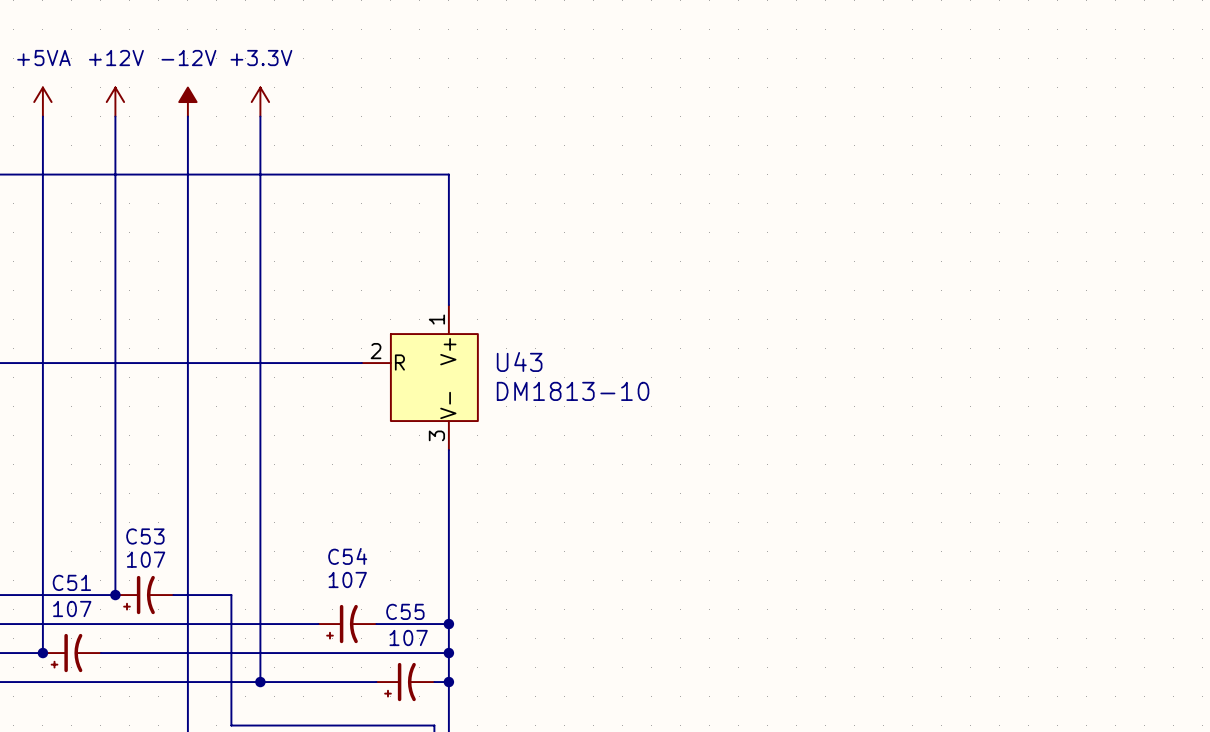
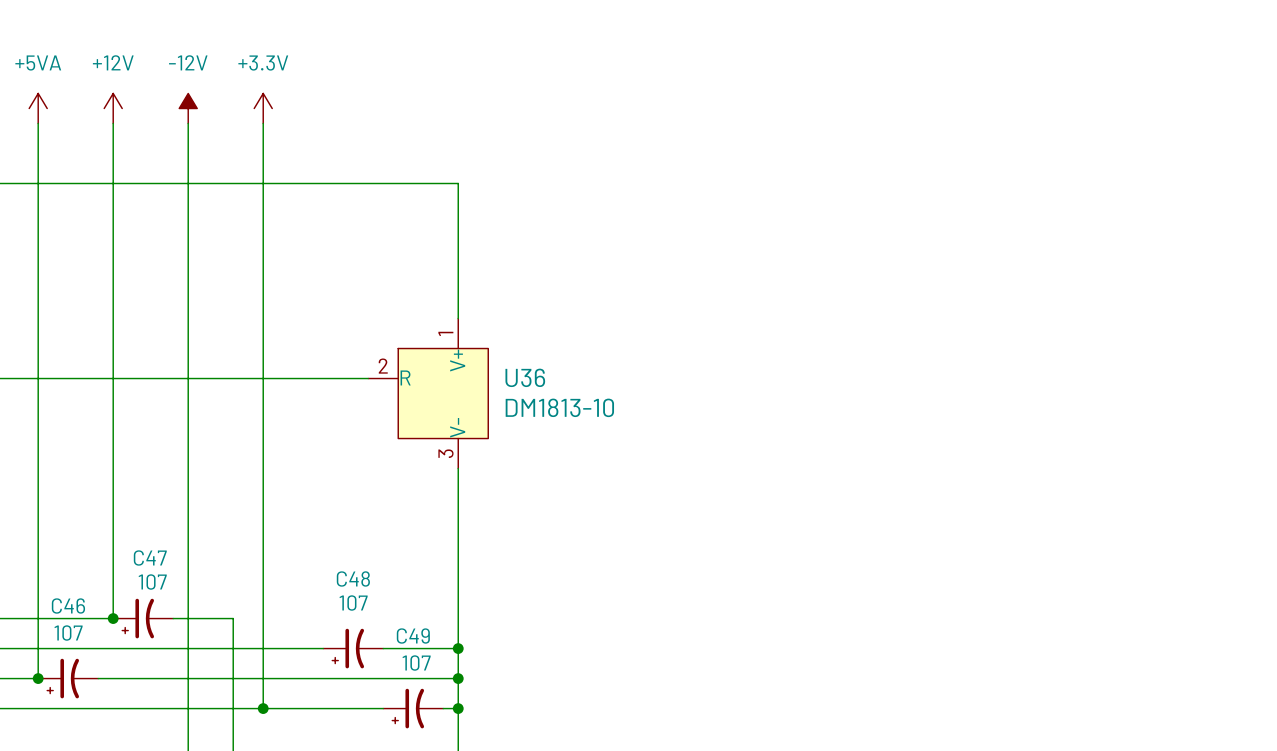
U43 name: U43 (519, 361) -> U36 (525, 377)
C53 name: C53 (145, 536) -> C47 (150, 558)
C54 name: C54 (347, 556) -> C48 (353, 578)
C51 name: C51 (71, 582) -> C46 (68, 606)
C55 name: C55 (405, 611) -> C49 (413, 636)

